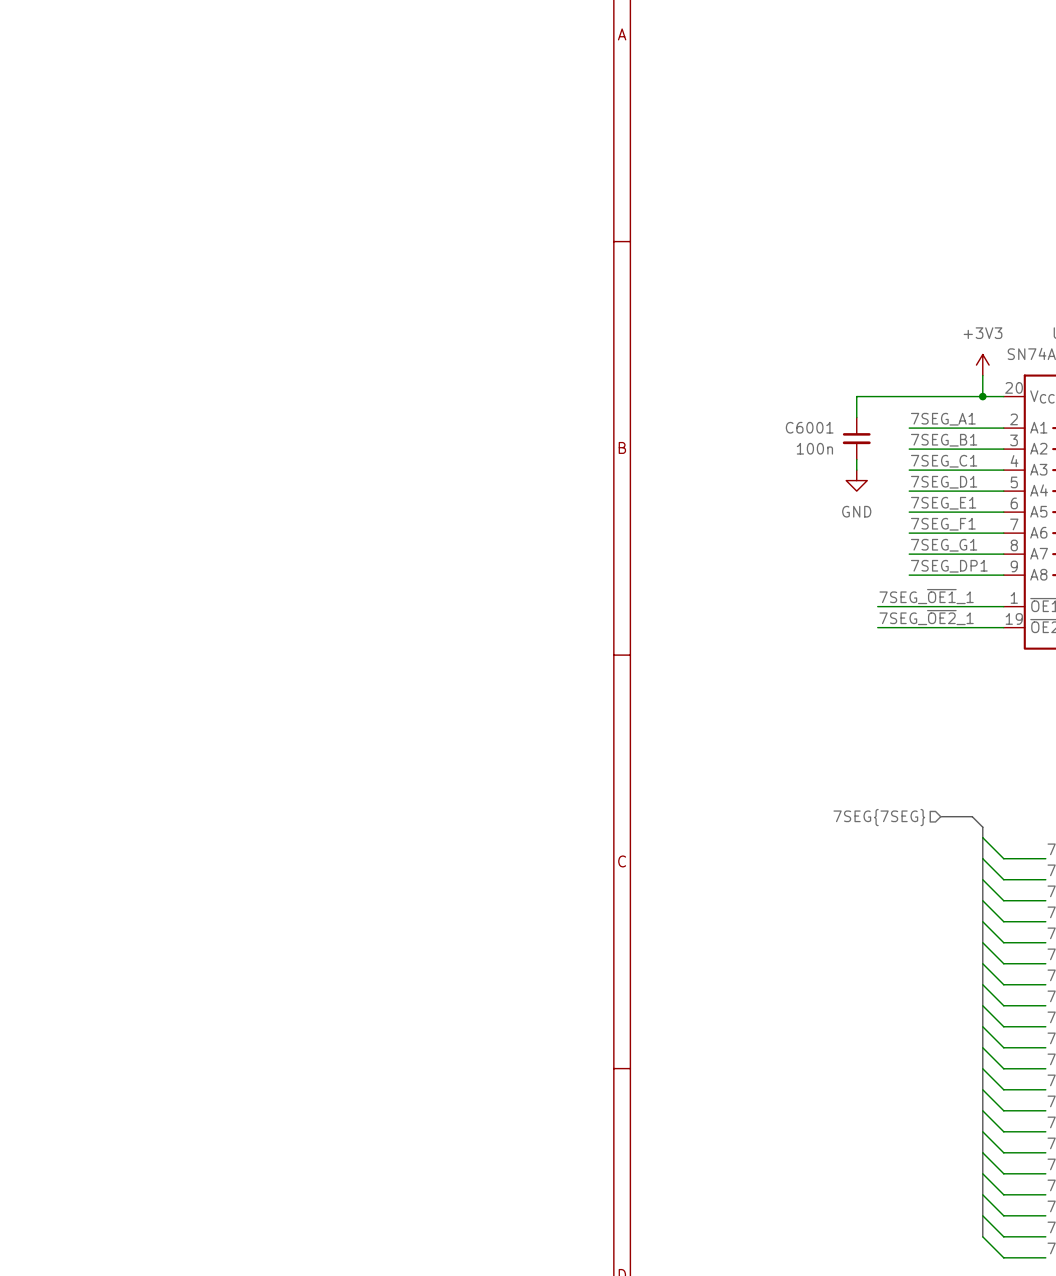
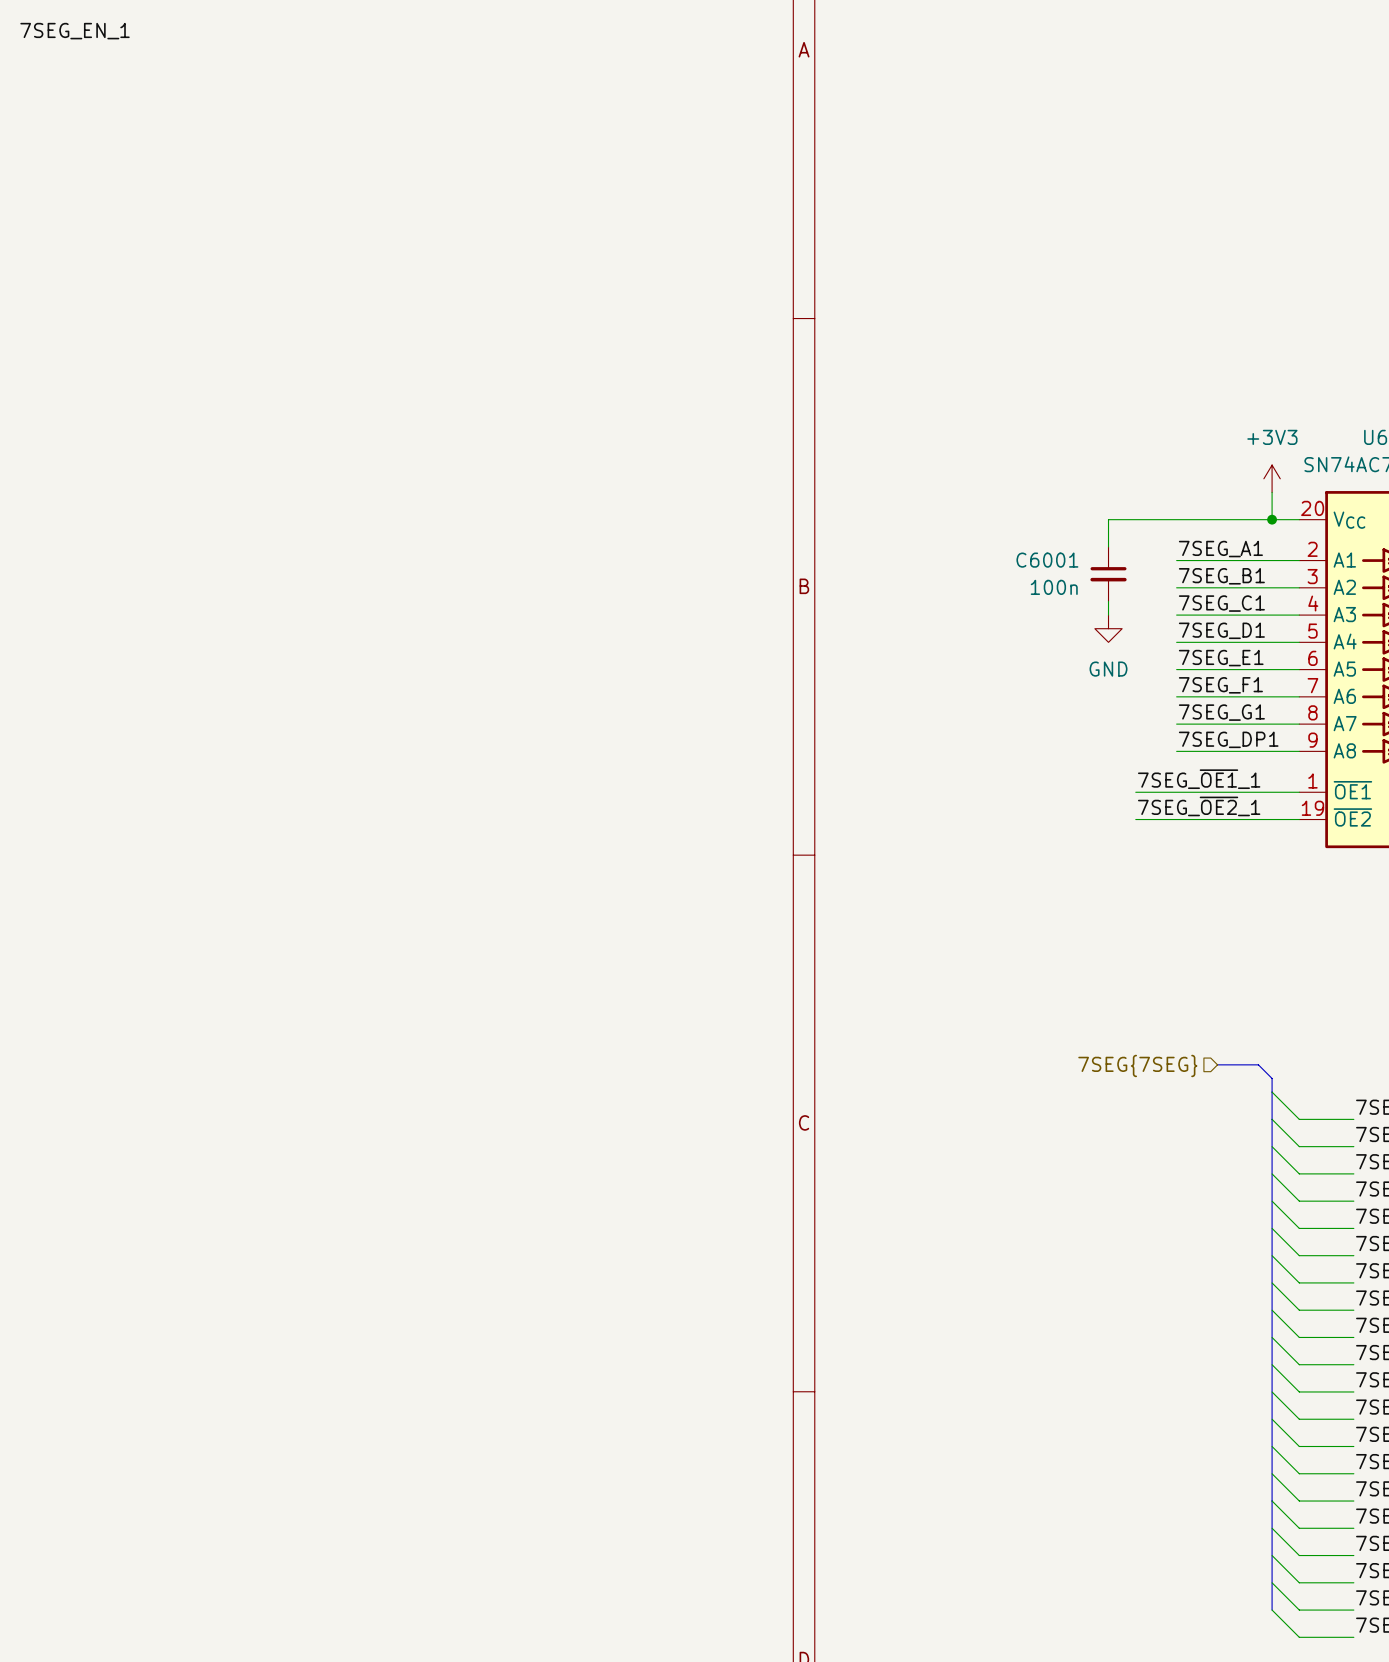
label: none -> 7SEG_EN_1 (75, 31)

